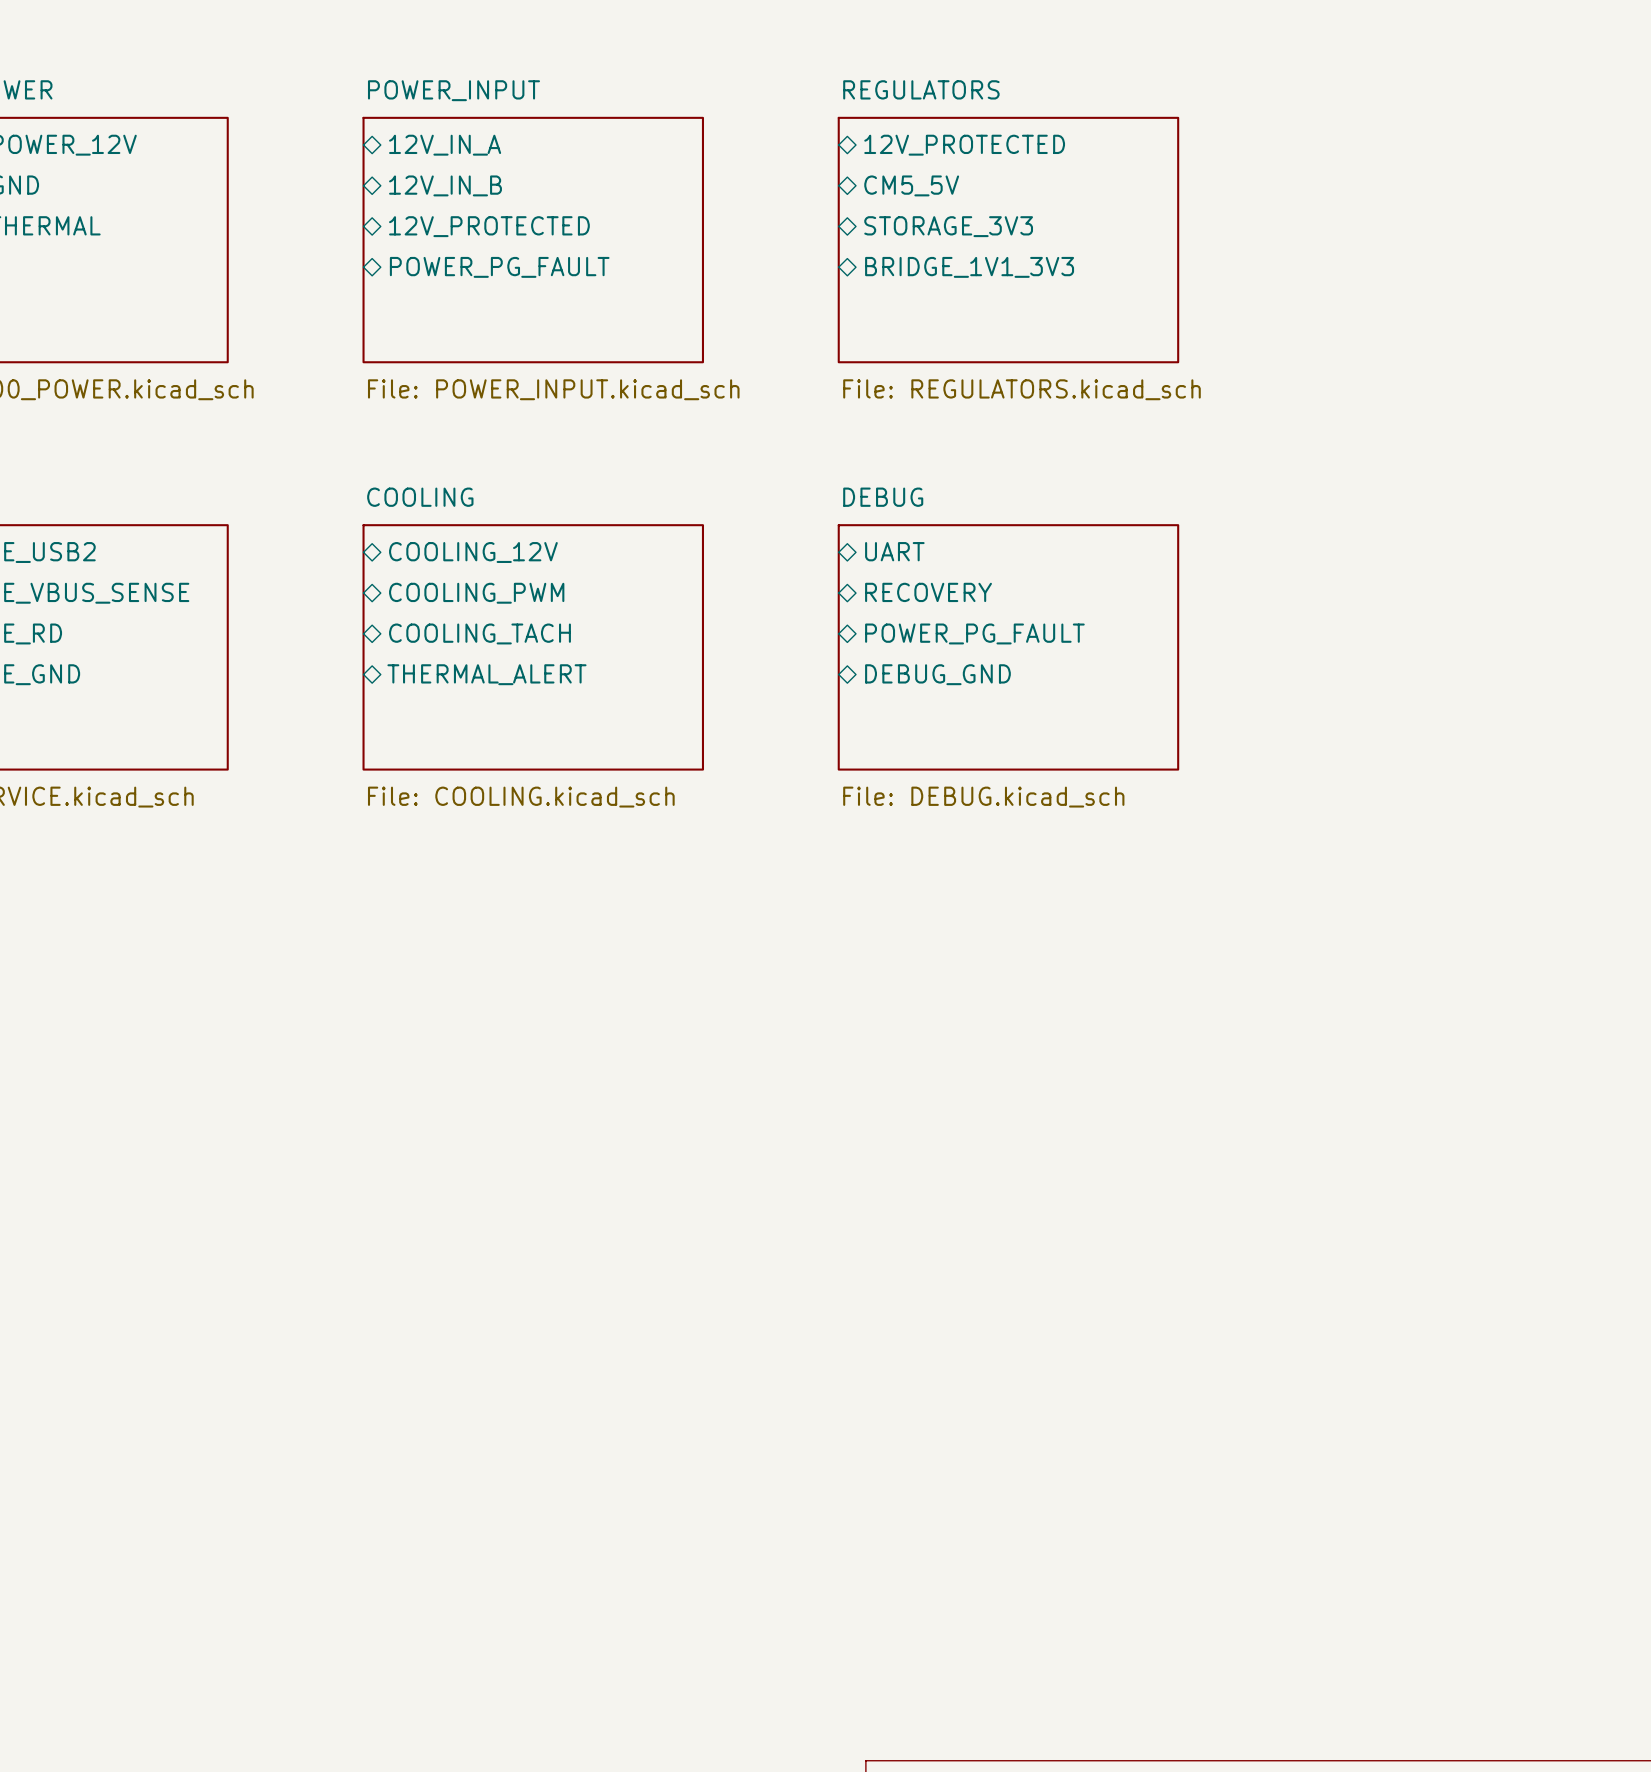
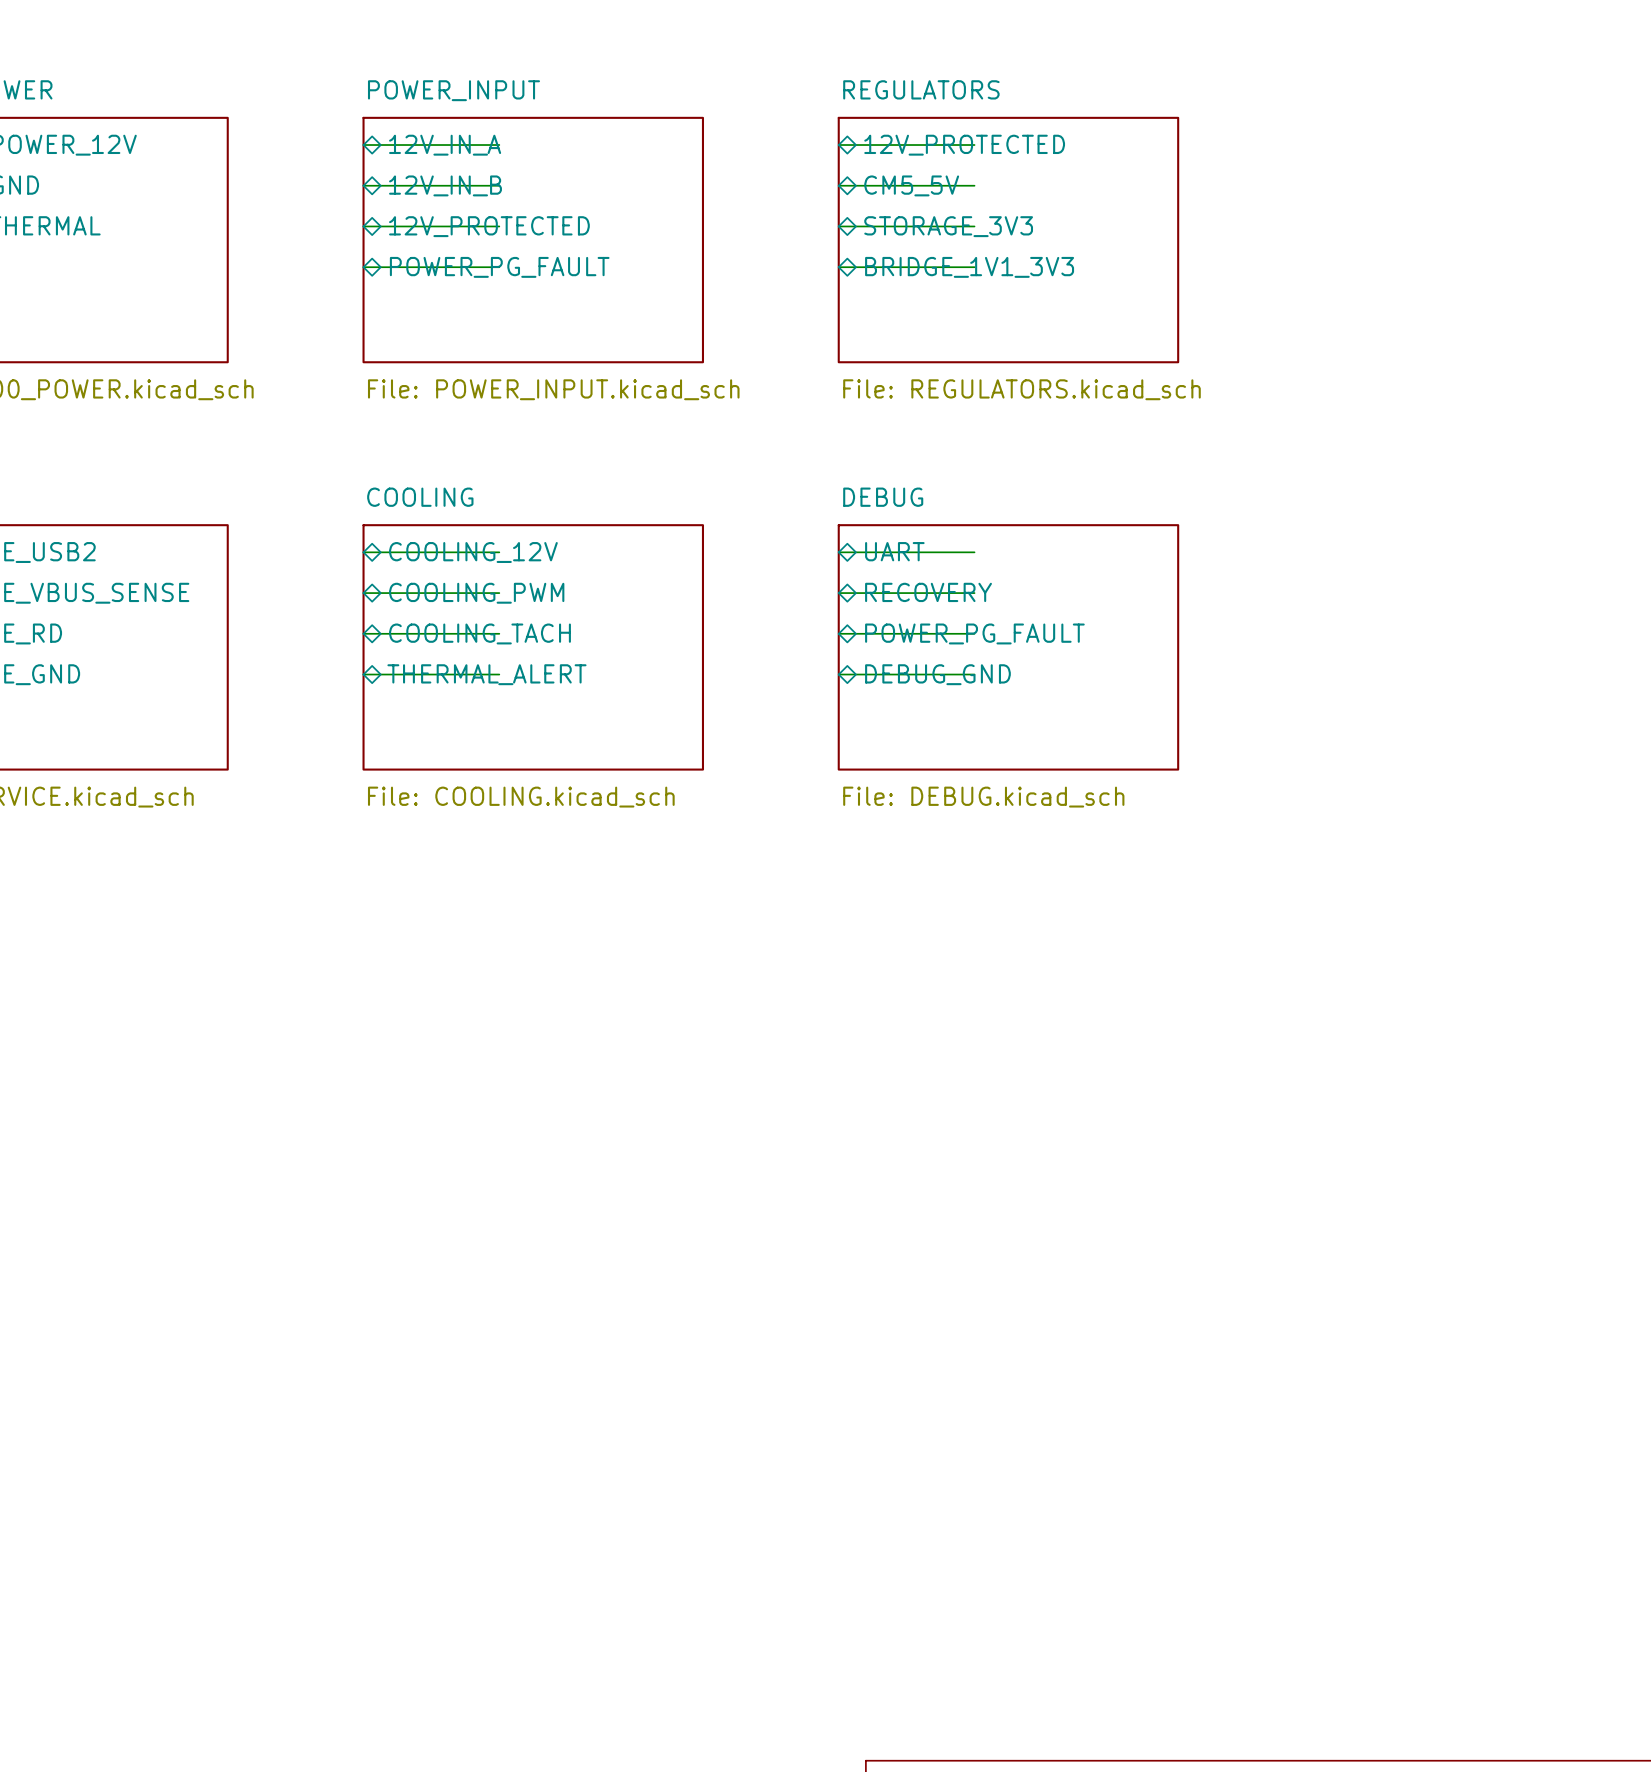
wire: none -> (363, 145) (499, 145)
wire: none -> (838, 145) (974, 145)
wire: none -> (363, 185) (499, 185)
wire: none -> (838, 185) (974, 185)
wire: none -> (363, 226) (499, 226)
wire: none -> (838, 226) (974, 226)
wire: none -> (363, 267) (499, 267)
wire: none -> (838, 267) (974, 267)
wire: none -> (363, 552) (499, 552)
wire: none -> (838, 552) (974, 552)
wire: none -> (363, 593) (499, 593)
wire: none -> (838, 593) (974, 593)
wire: none -> (363, 633) (499, 633)
wire: none -> (838, 633) (974, 633)
wire: none -> (363, 674) (499, 674)
wire: none -> (838, 674) (974, 674)

